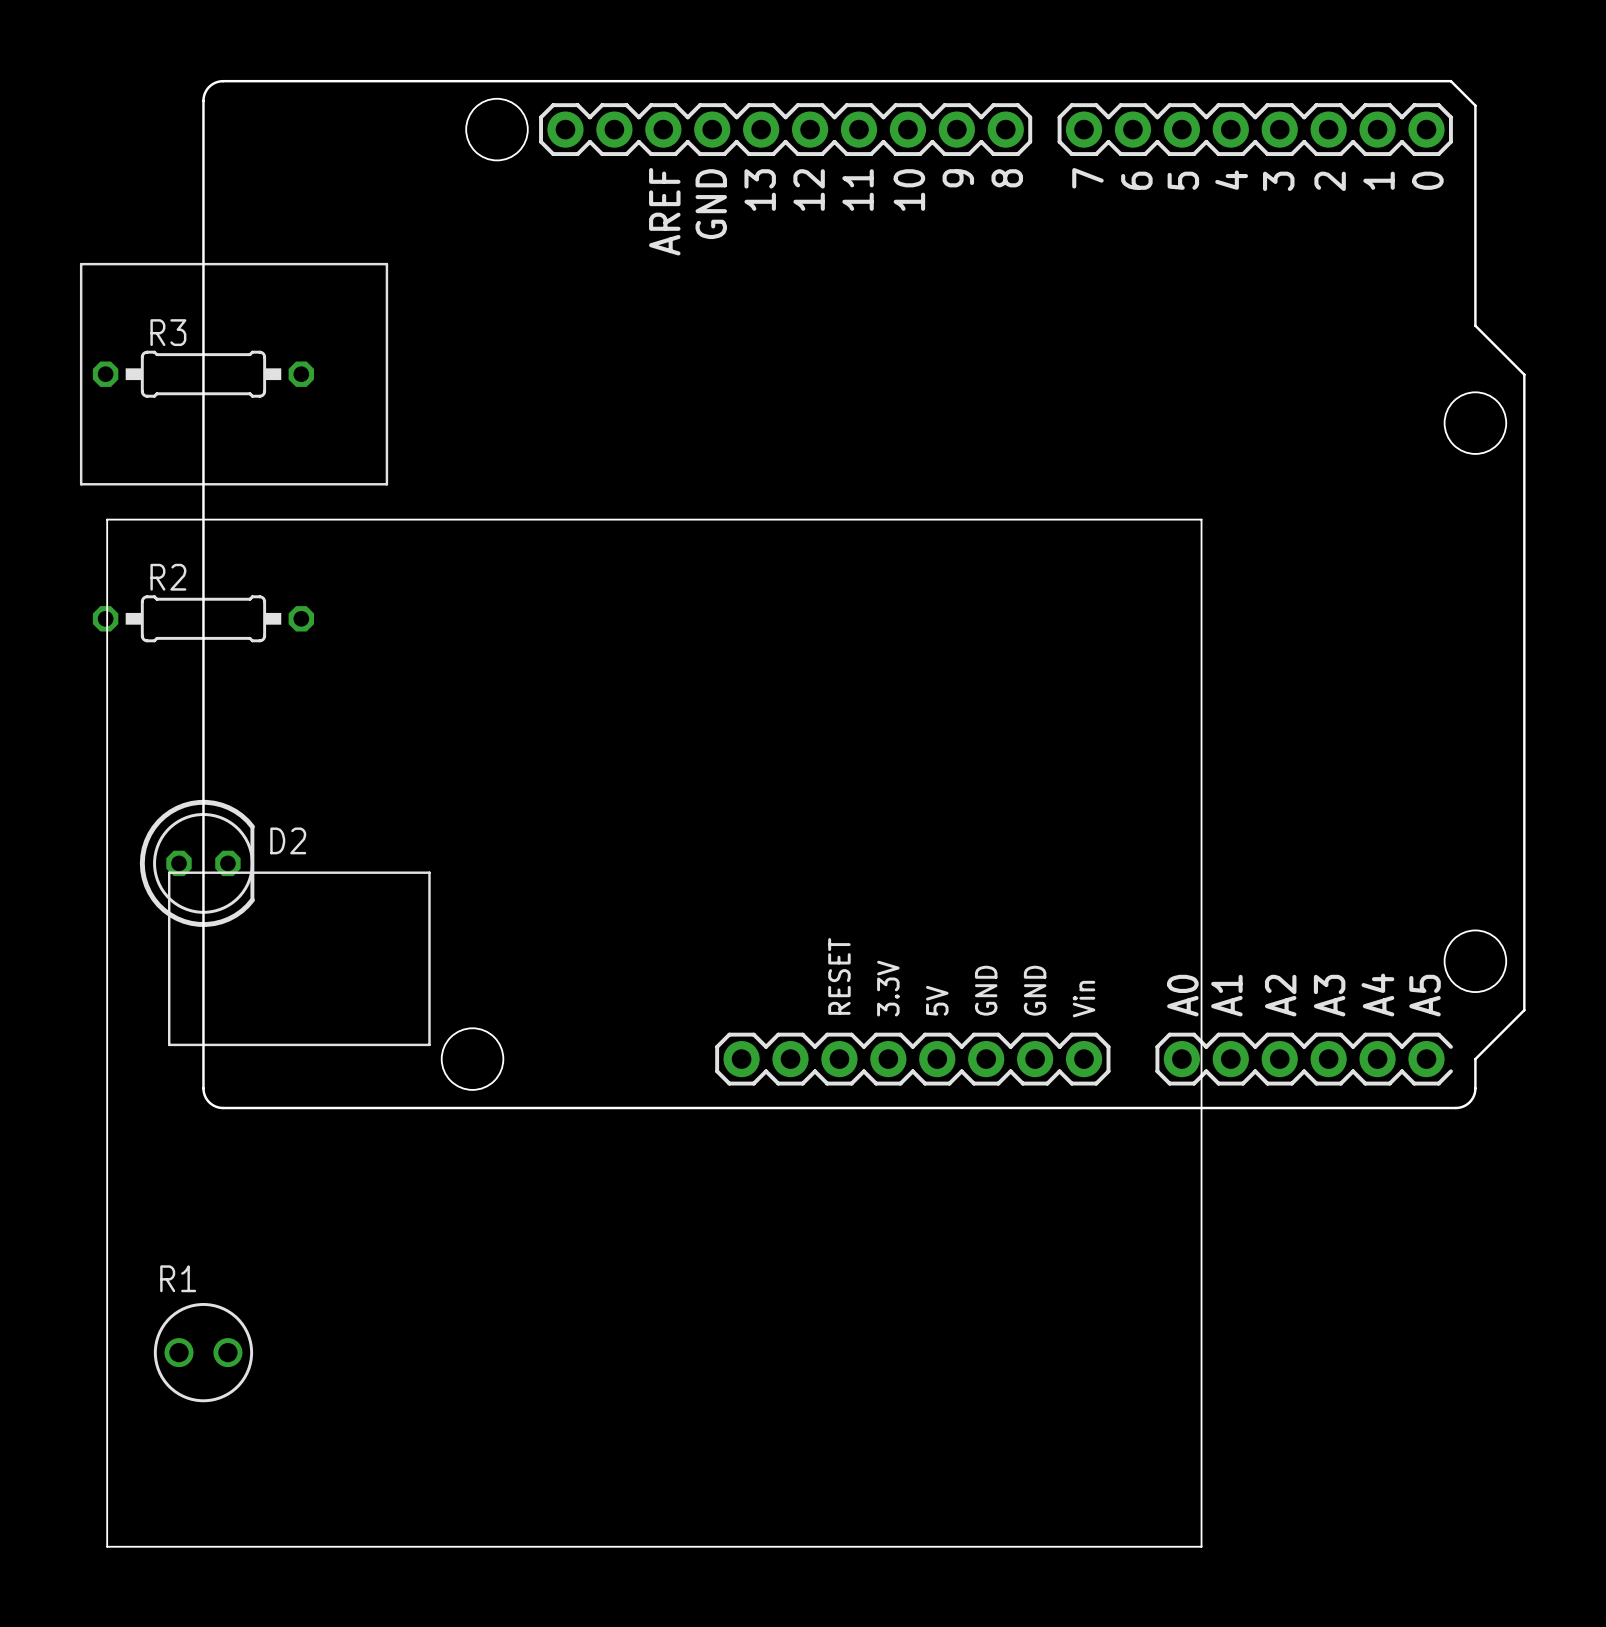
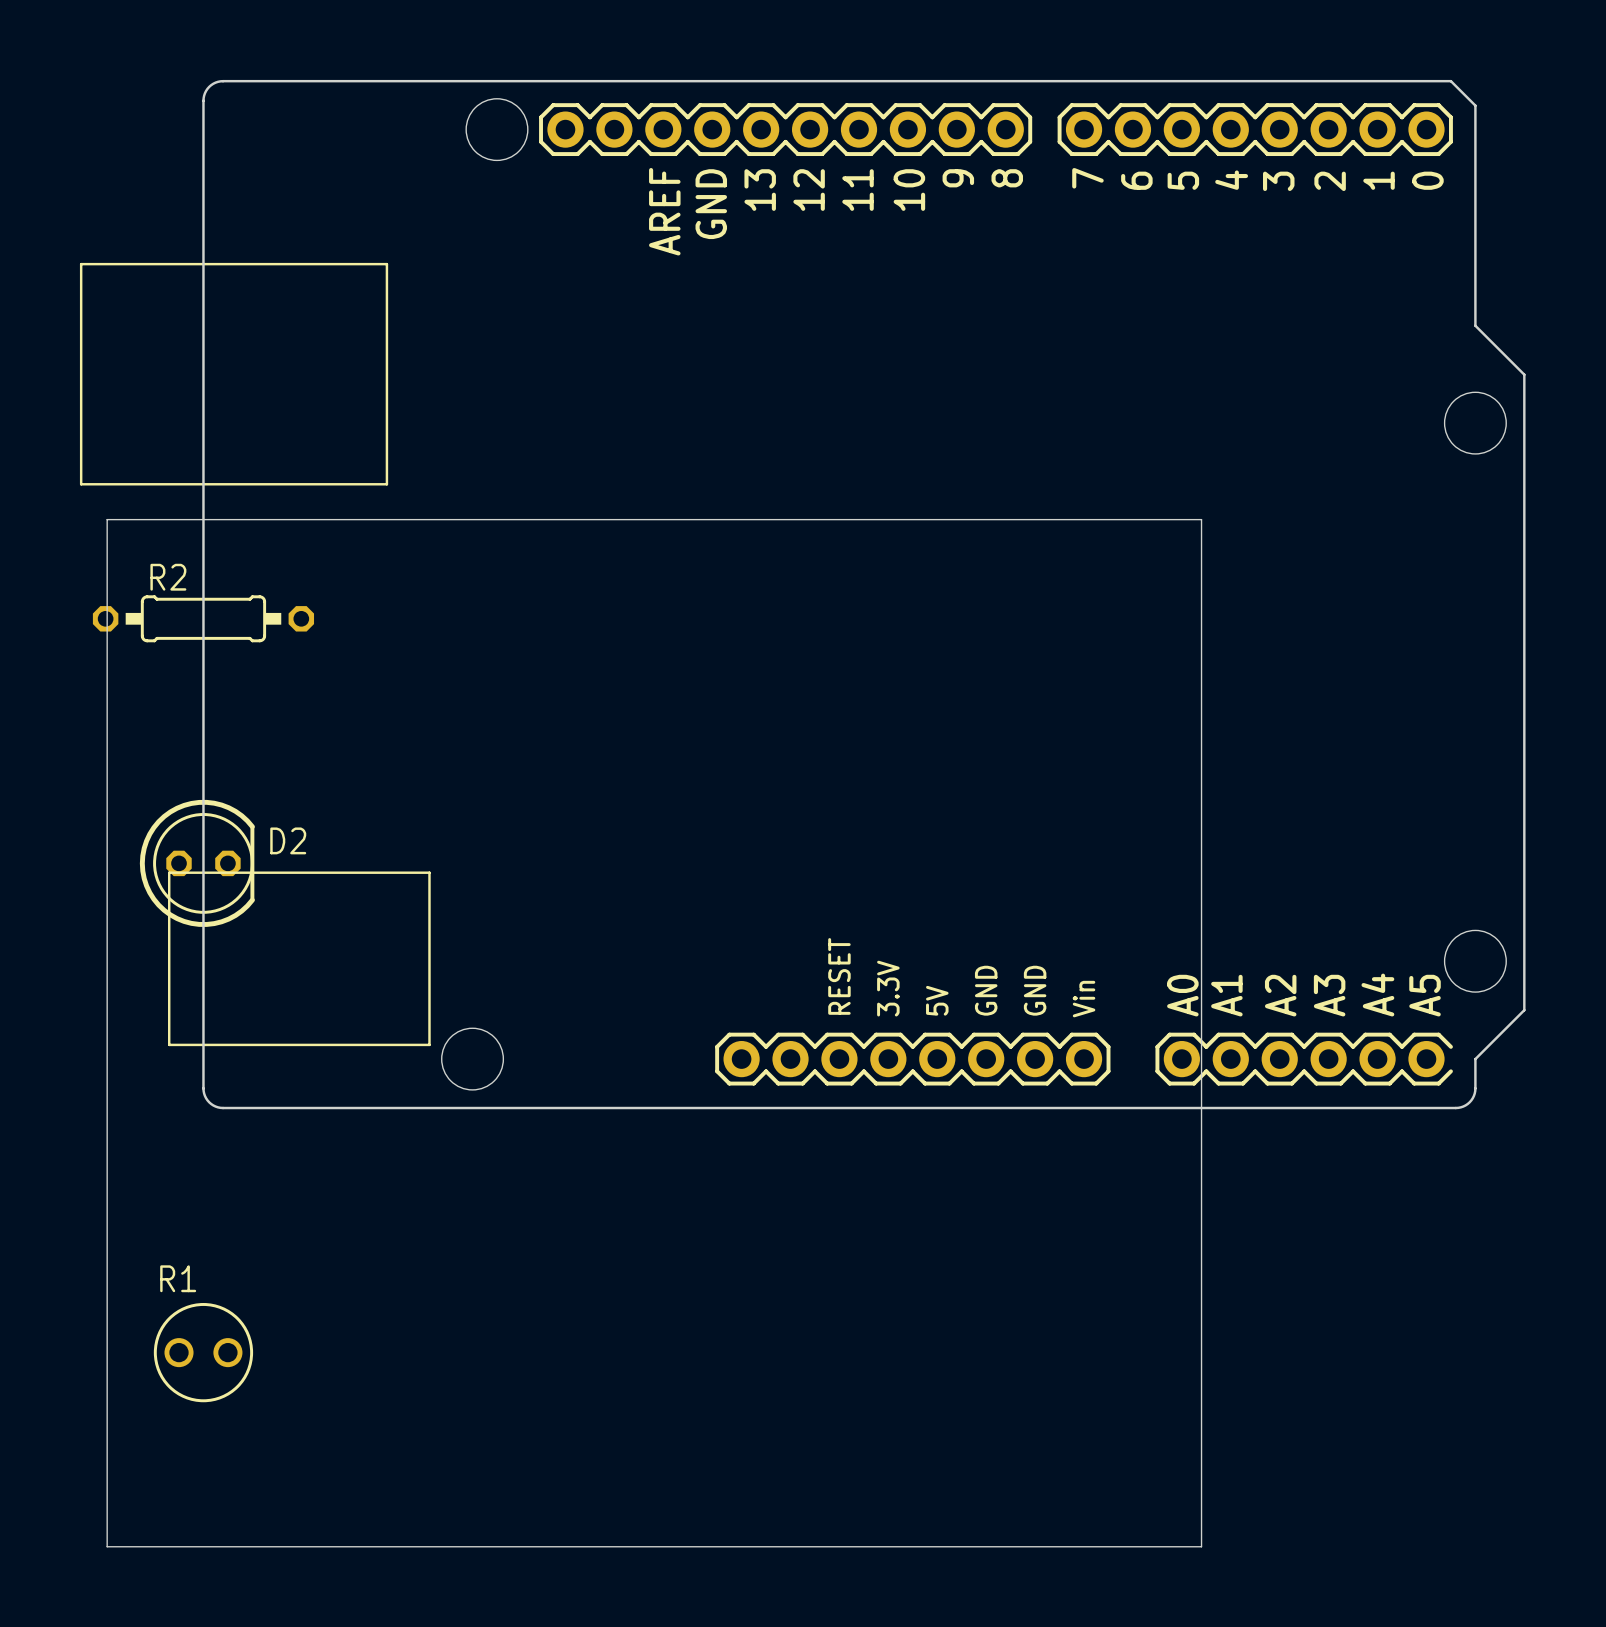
R3: (203, 374) -> none

